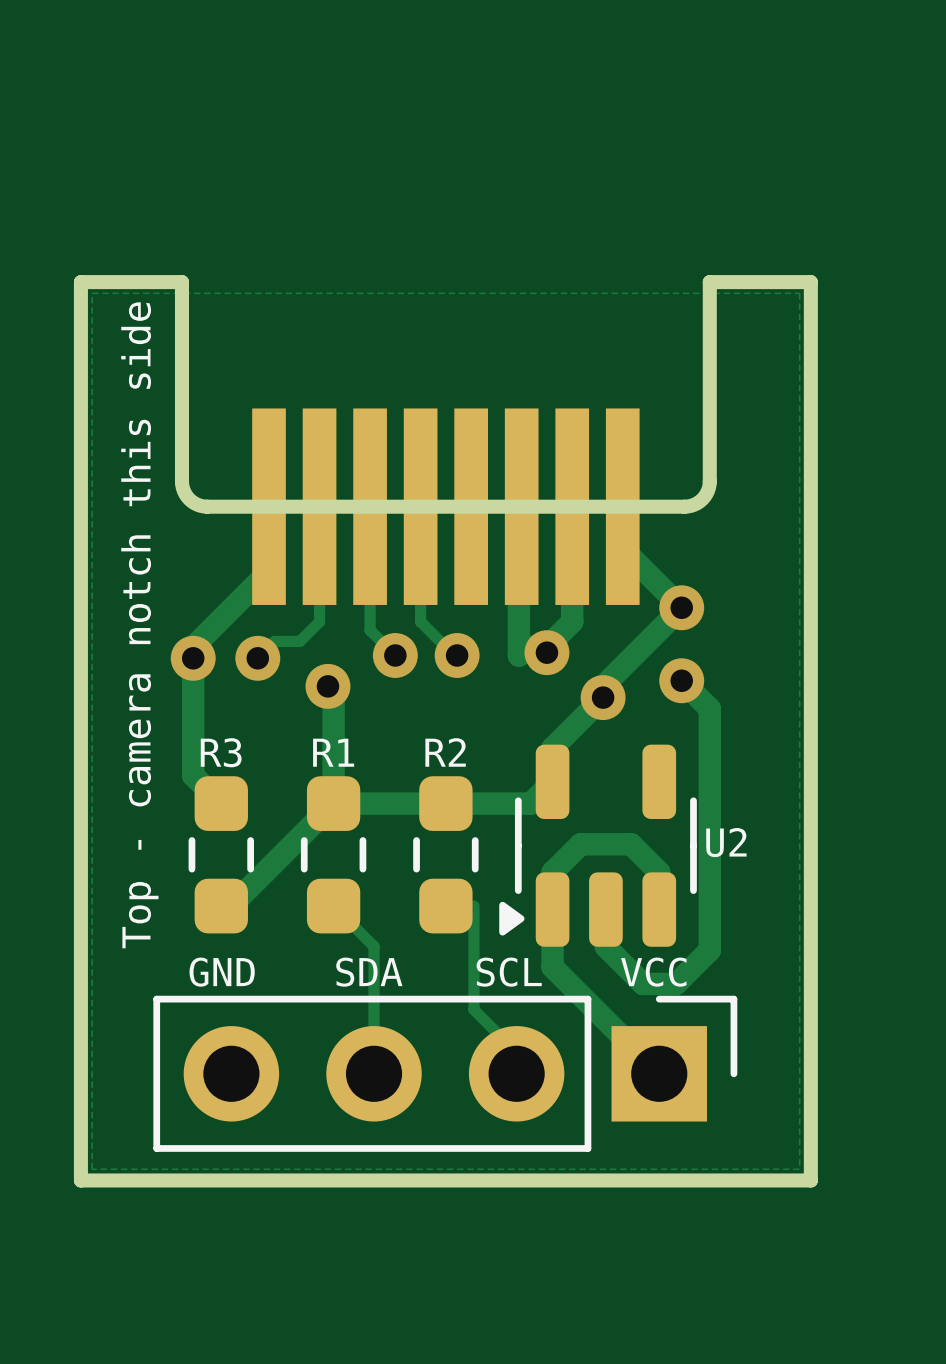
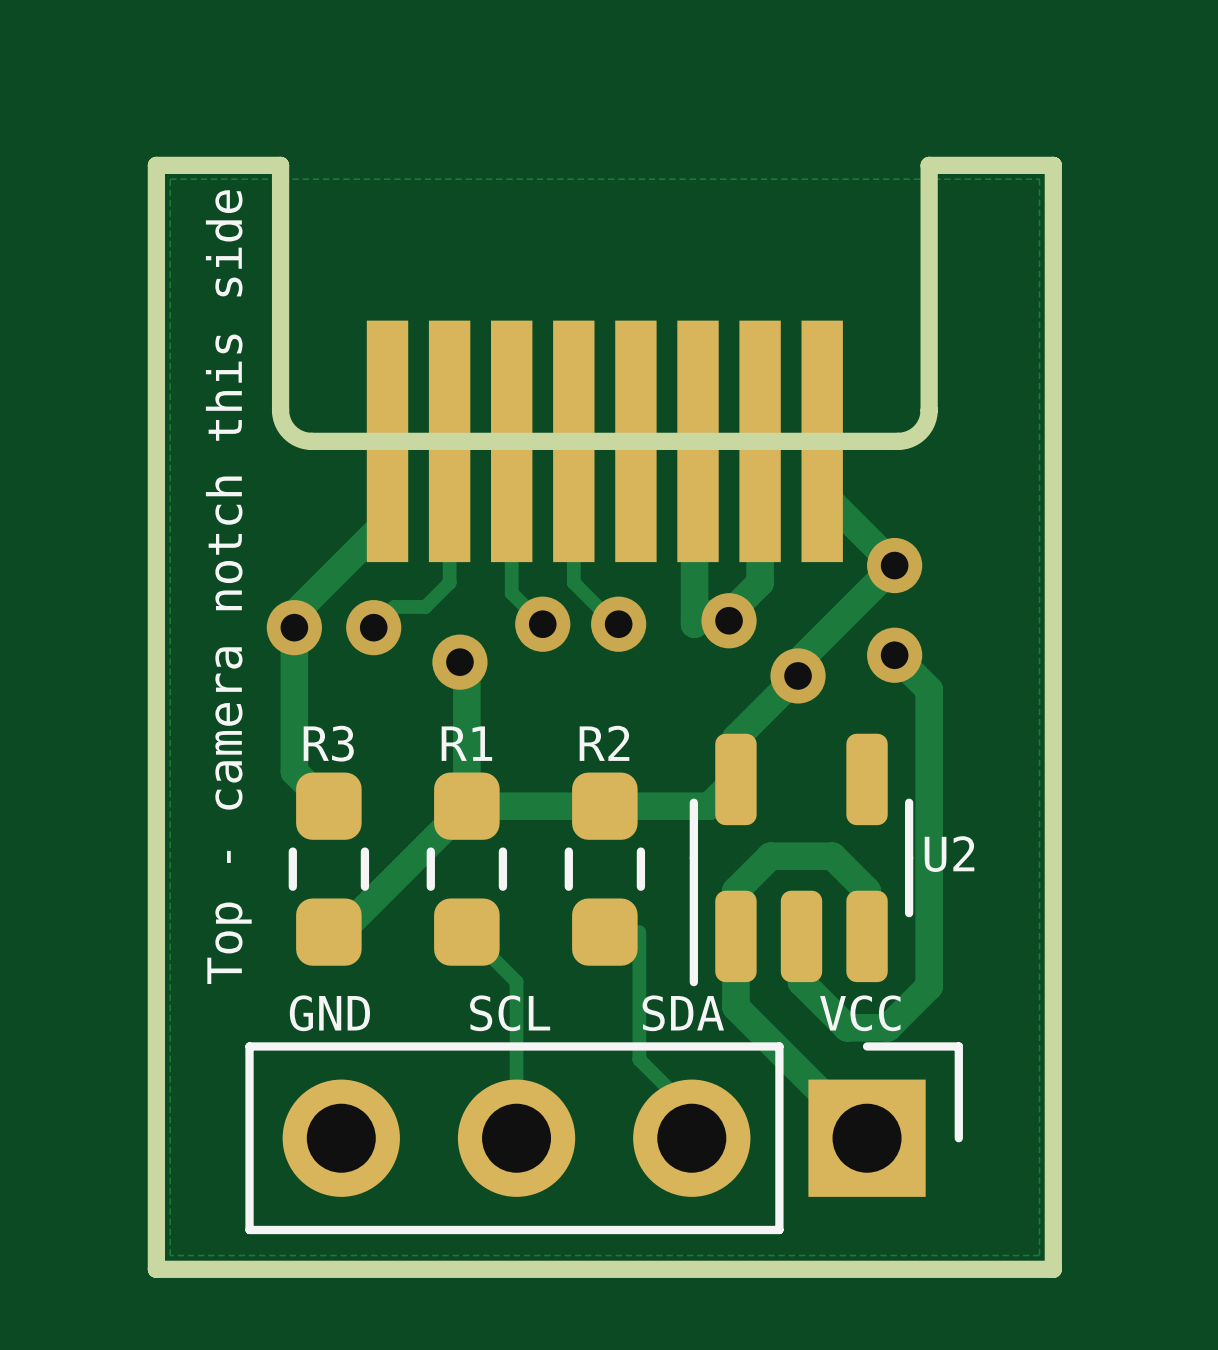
U2 footprint: [499, 744, 697, 947] -> [689, 733, 914, 987]
text: SDA (369, 972) -> SCL (510, 1013)
text: SCL (509, 972) -> SDA (683, 1013)

